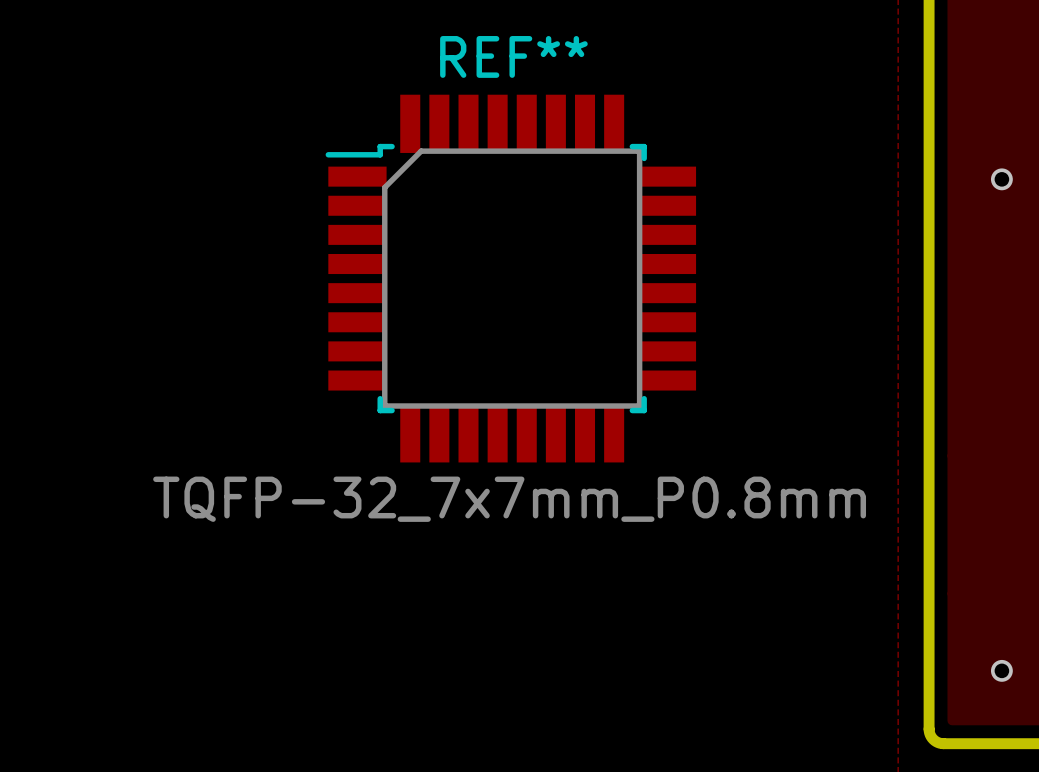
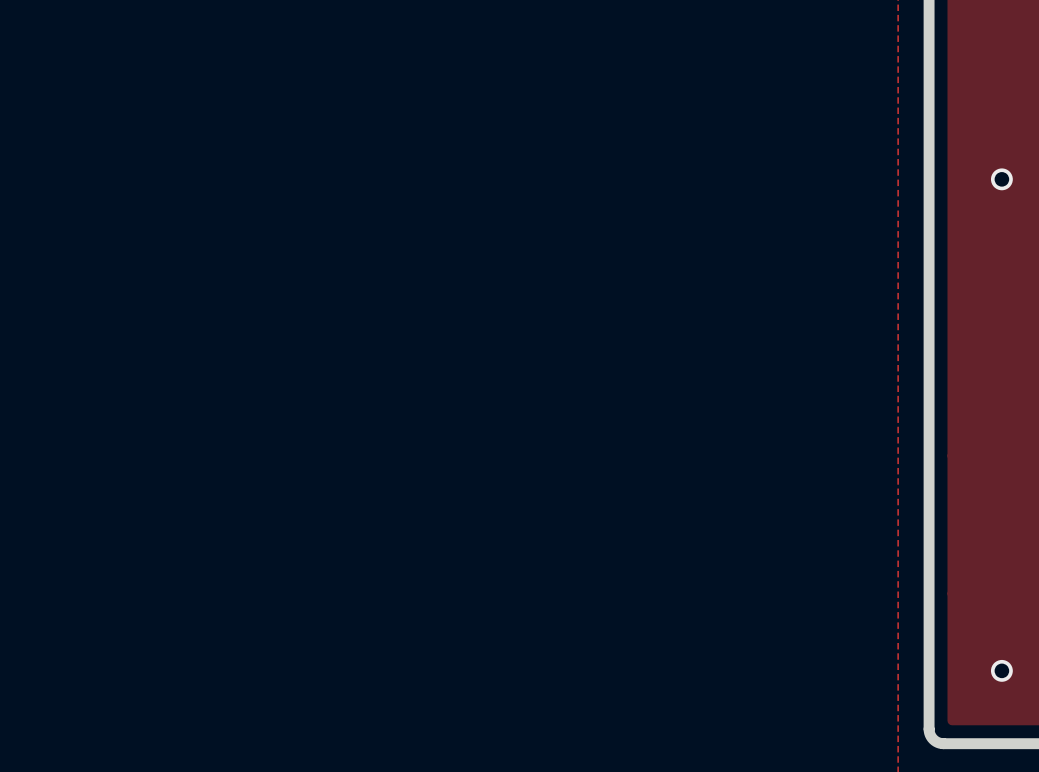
REF**: TQFP-32_7x7mm_P0.8mm (510, 278) -> none

